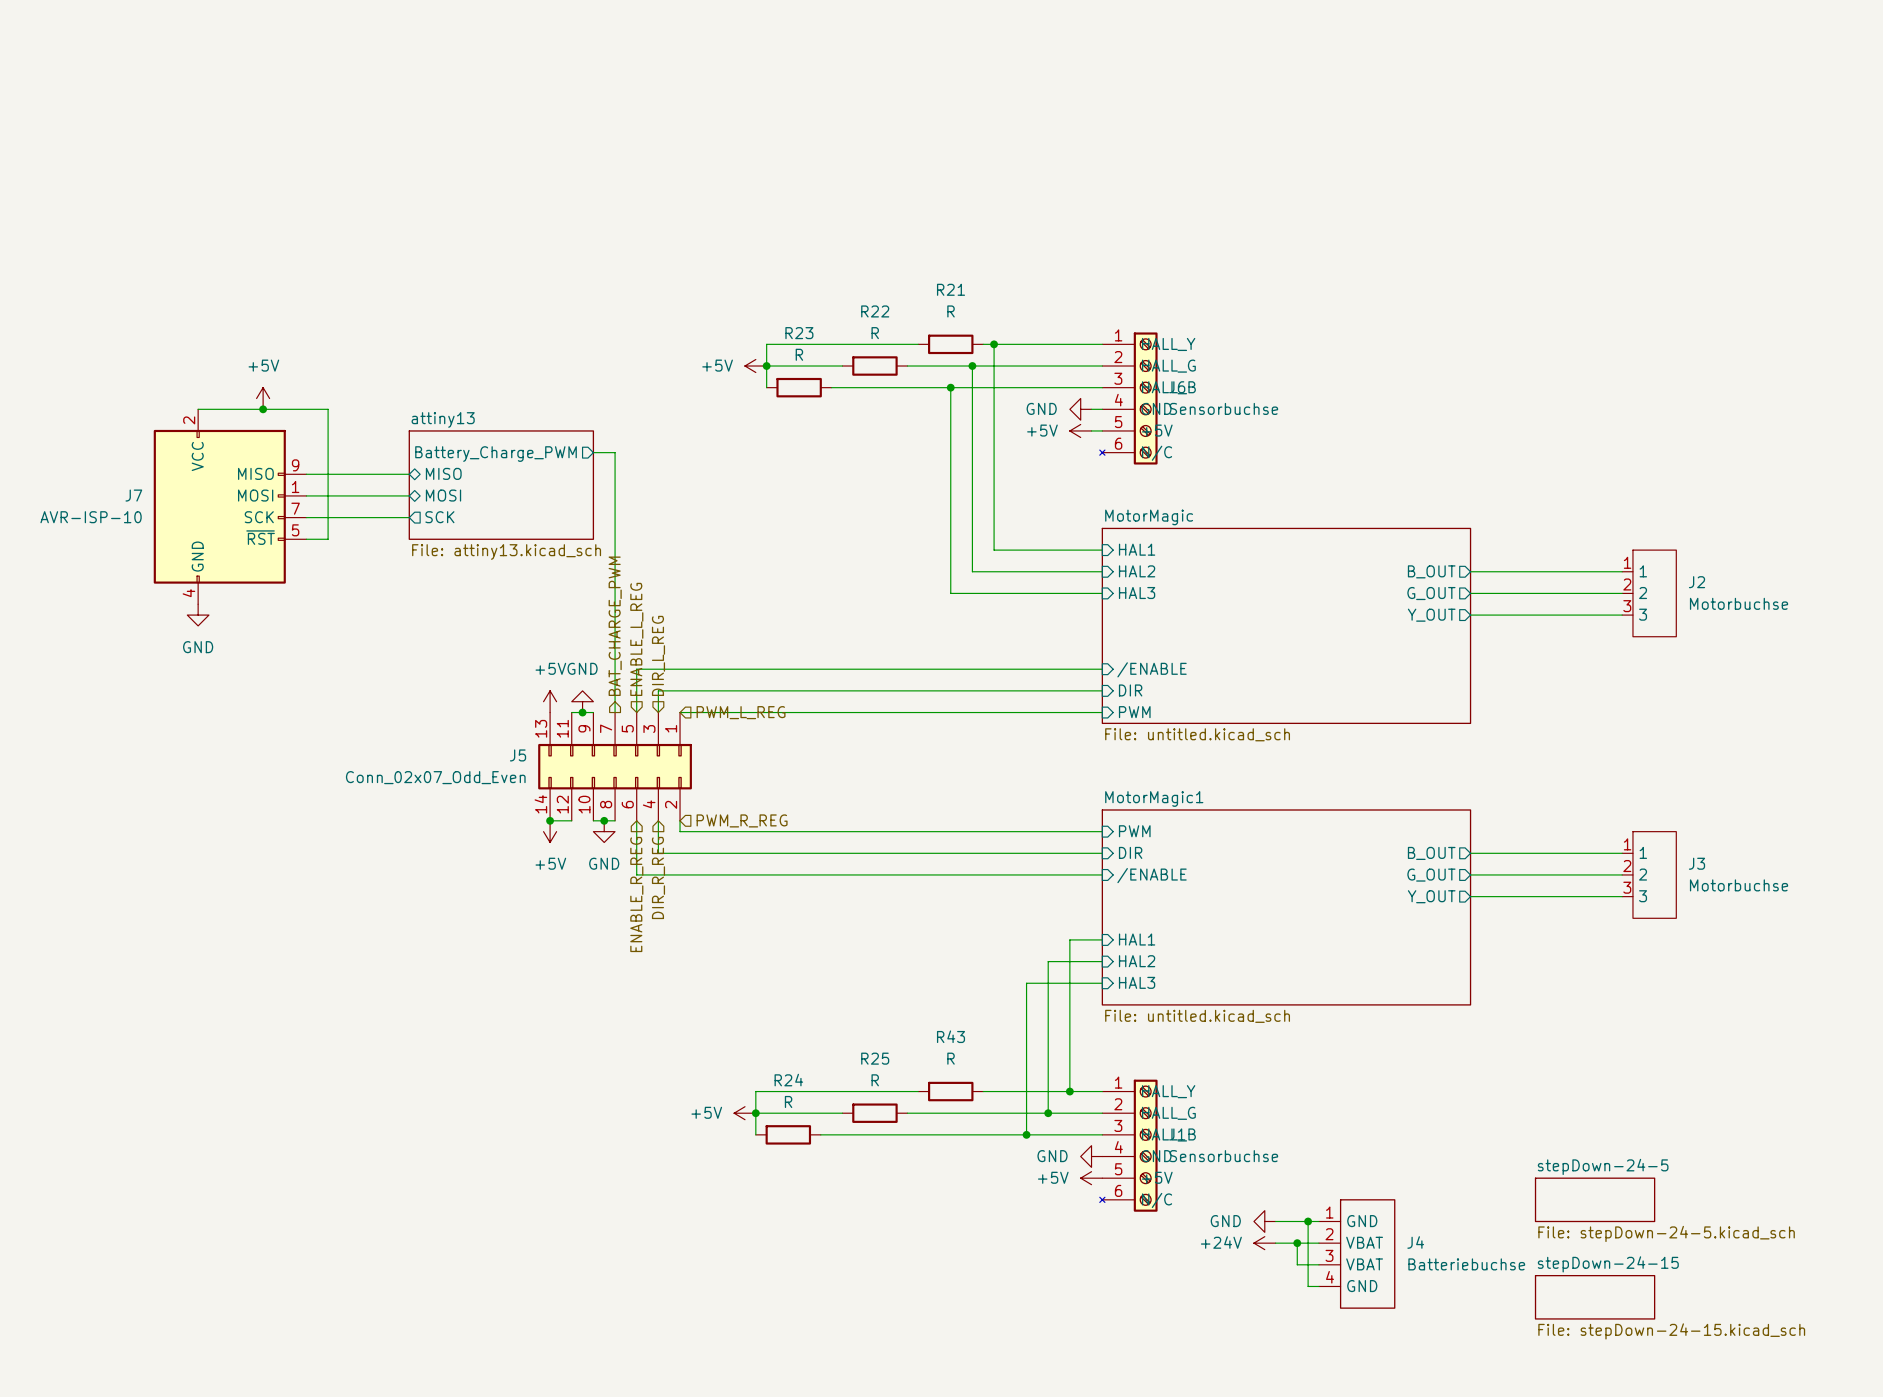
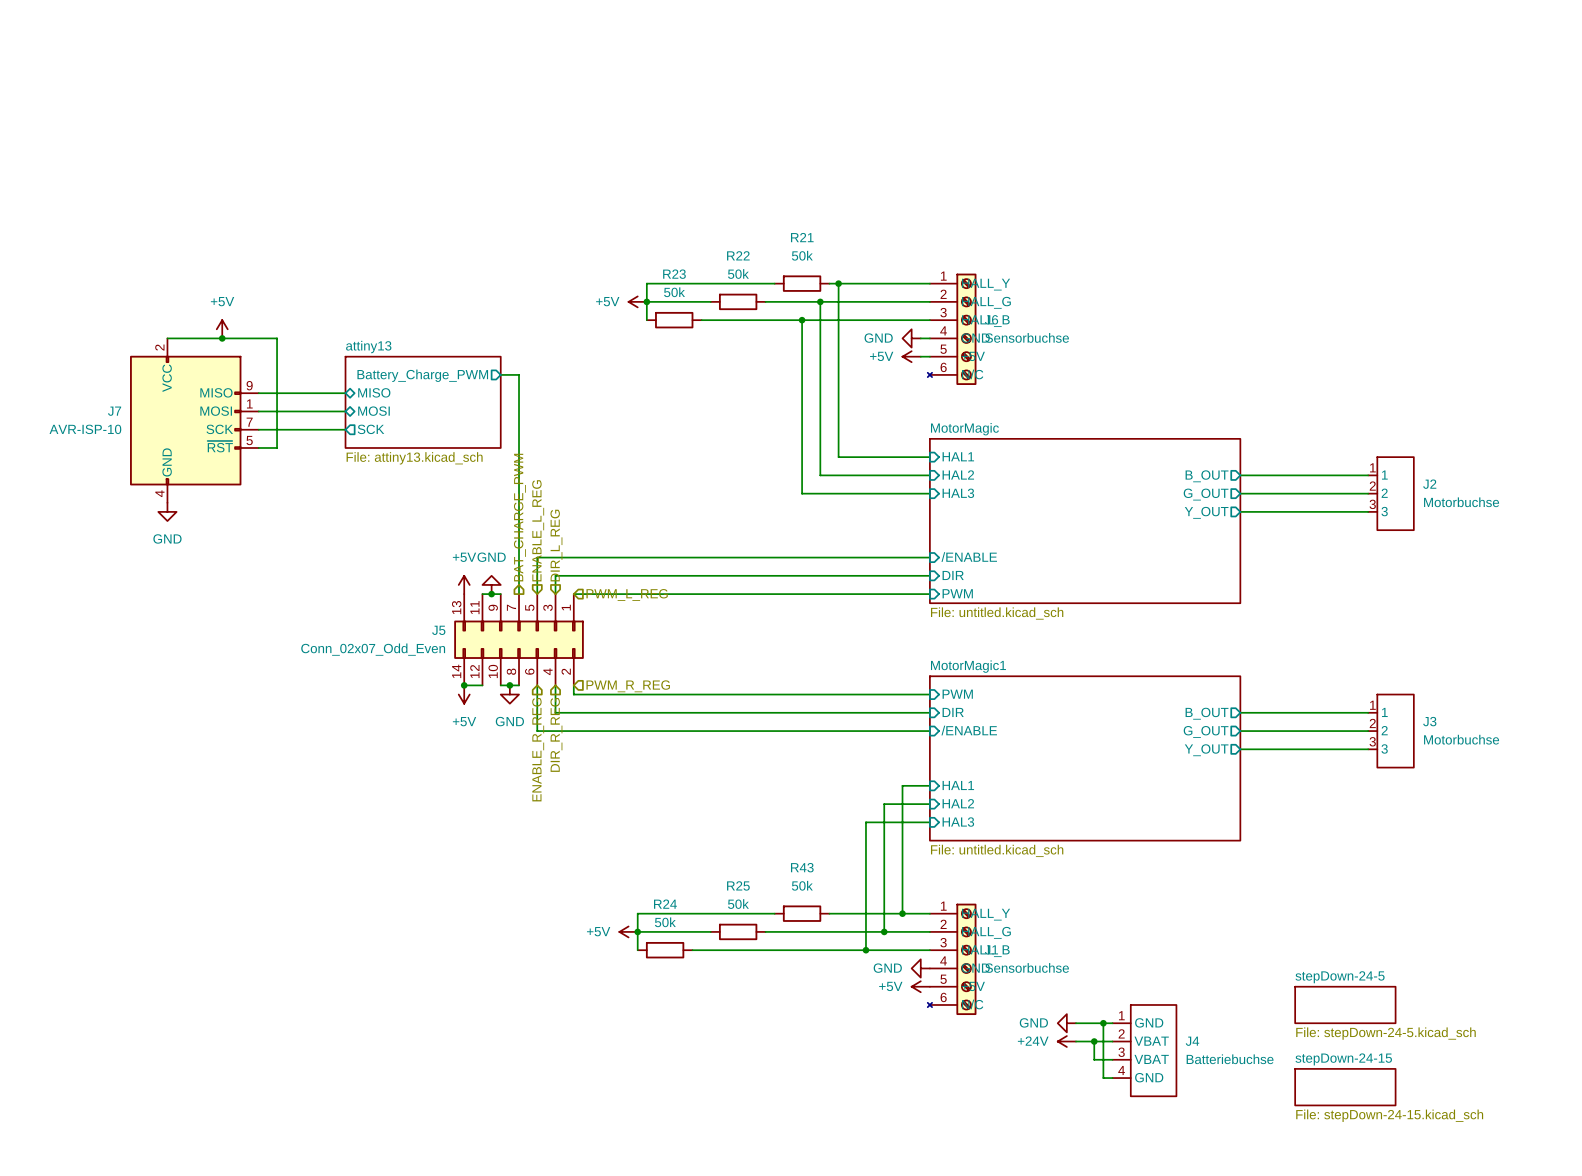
R21 value: R (951, 311) -> 50k (802, 255)
R22 value: R (875, 333) -> 50k (738, 273)
R23 value: R (799, 354) -> 50k (674, 292)
R43 value: R (951, 1058) -> 50k (802, 885)
R25 value: R (875, 1080) -> 50k (738, 904)
R24 value: R (788, 1101) -> 50k (665, 922)

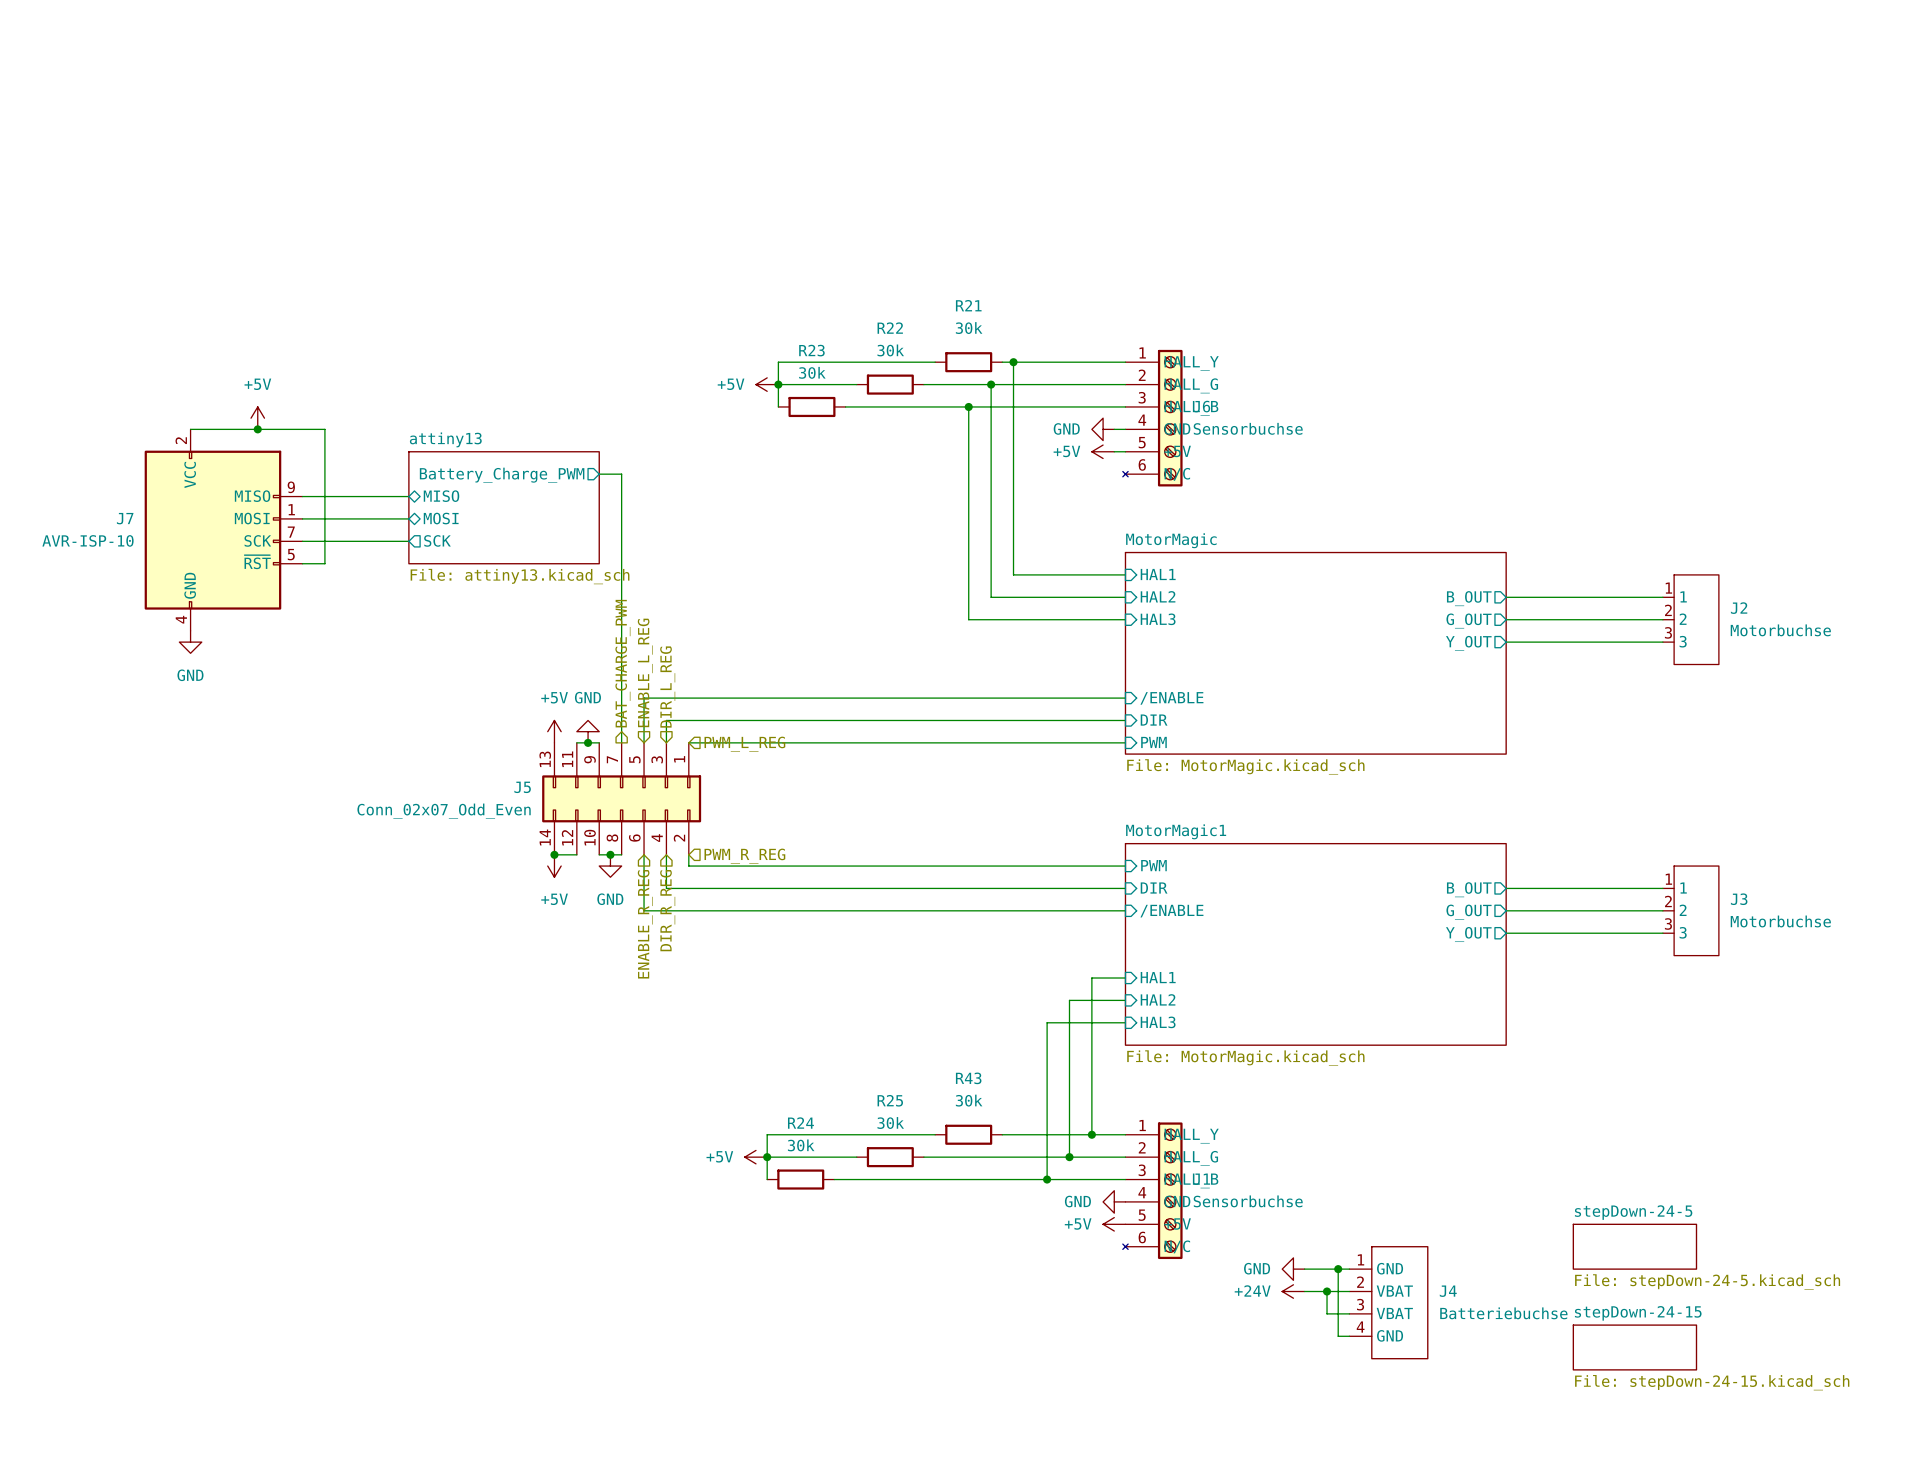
R21 value: 50k (802, 255) -> 30k (969, 328)
R22 value: 50k (738, 273) -> 30k (890, 350)
R23 value: 50k (674, 292) -> 30k (812, 372)
sheet MotorMagic value: File: untitled.kicad_sch (997, 613) -> File: MotorMagic.kicad_sch (1245, 766)
sheet MotorMagic1 value: File: untitled.kicad_sch (997, 850) -> File: MotorMagic.kicad_sch (1245, 1058)
R43 value: 50k (802, 885) -> 30k (969, 1100)
R25 value: 50k (738, 904) -> 30k (890, 1123)
R24 value: 50k (665, 922) -> 30k (801, 1145)

